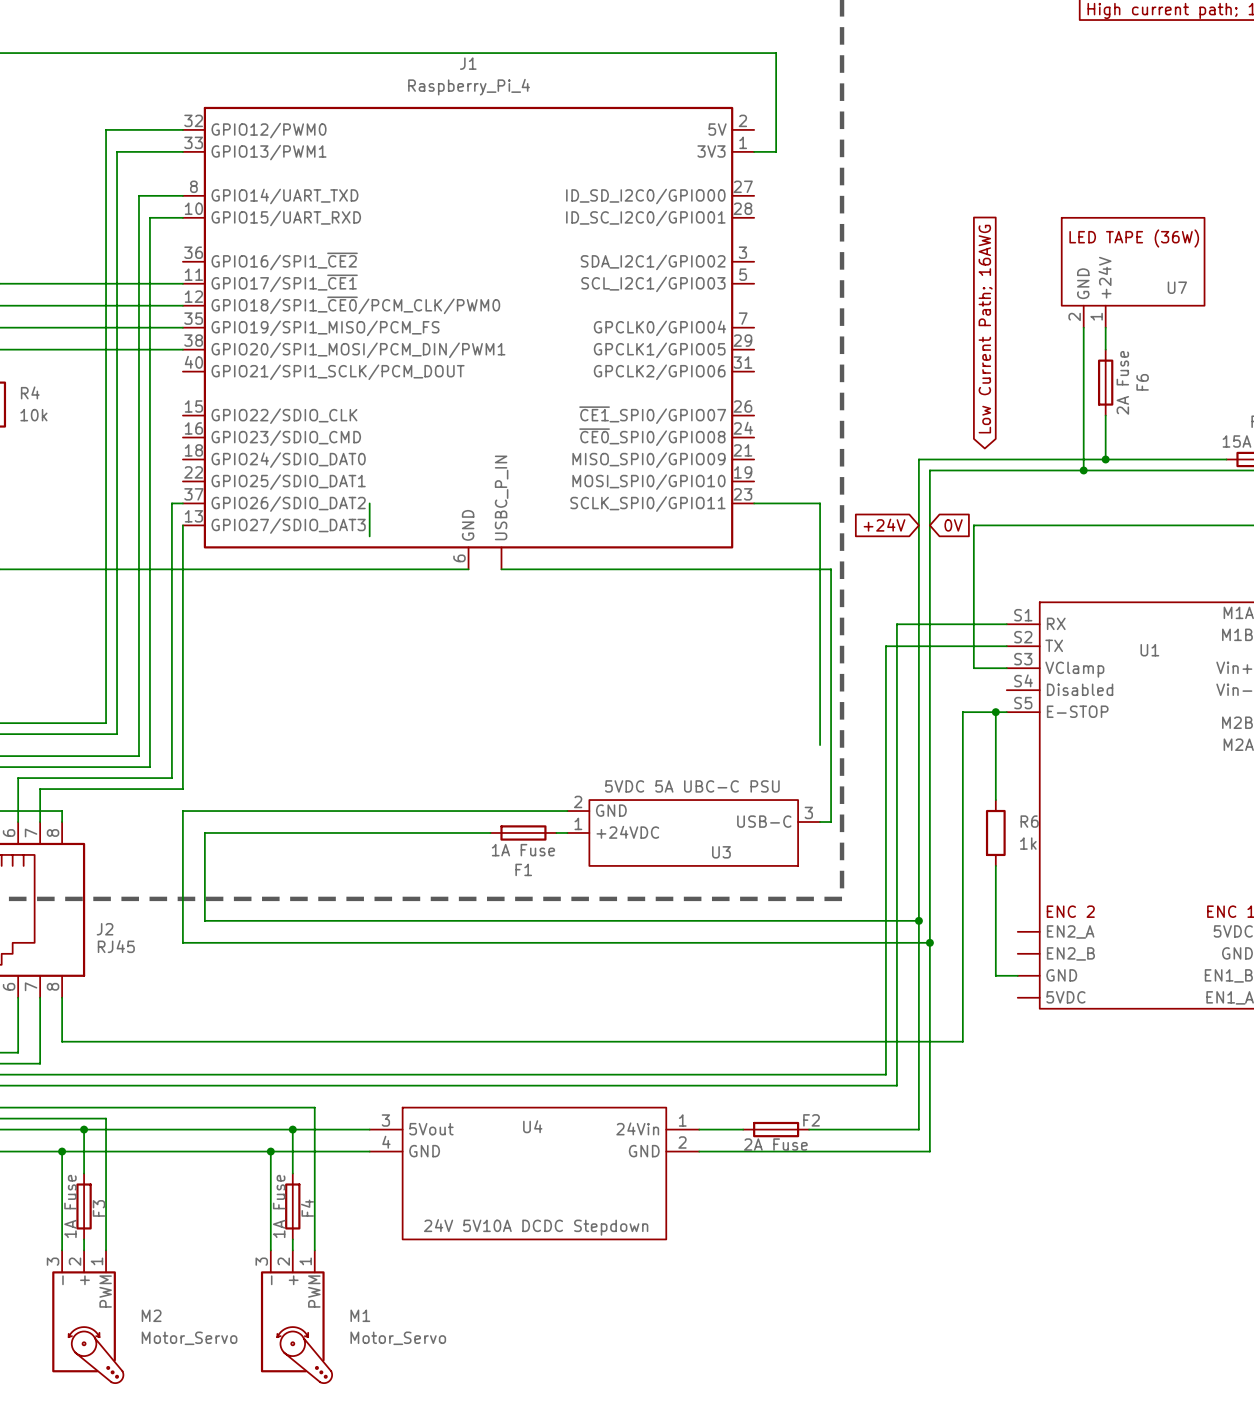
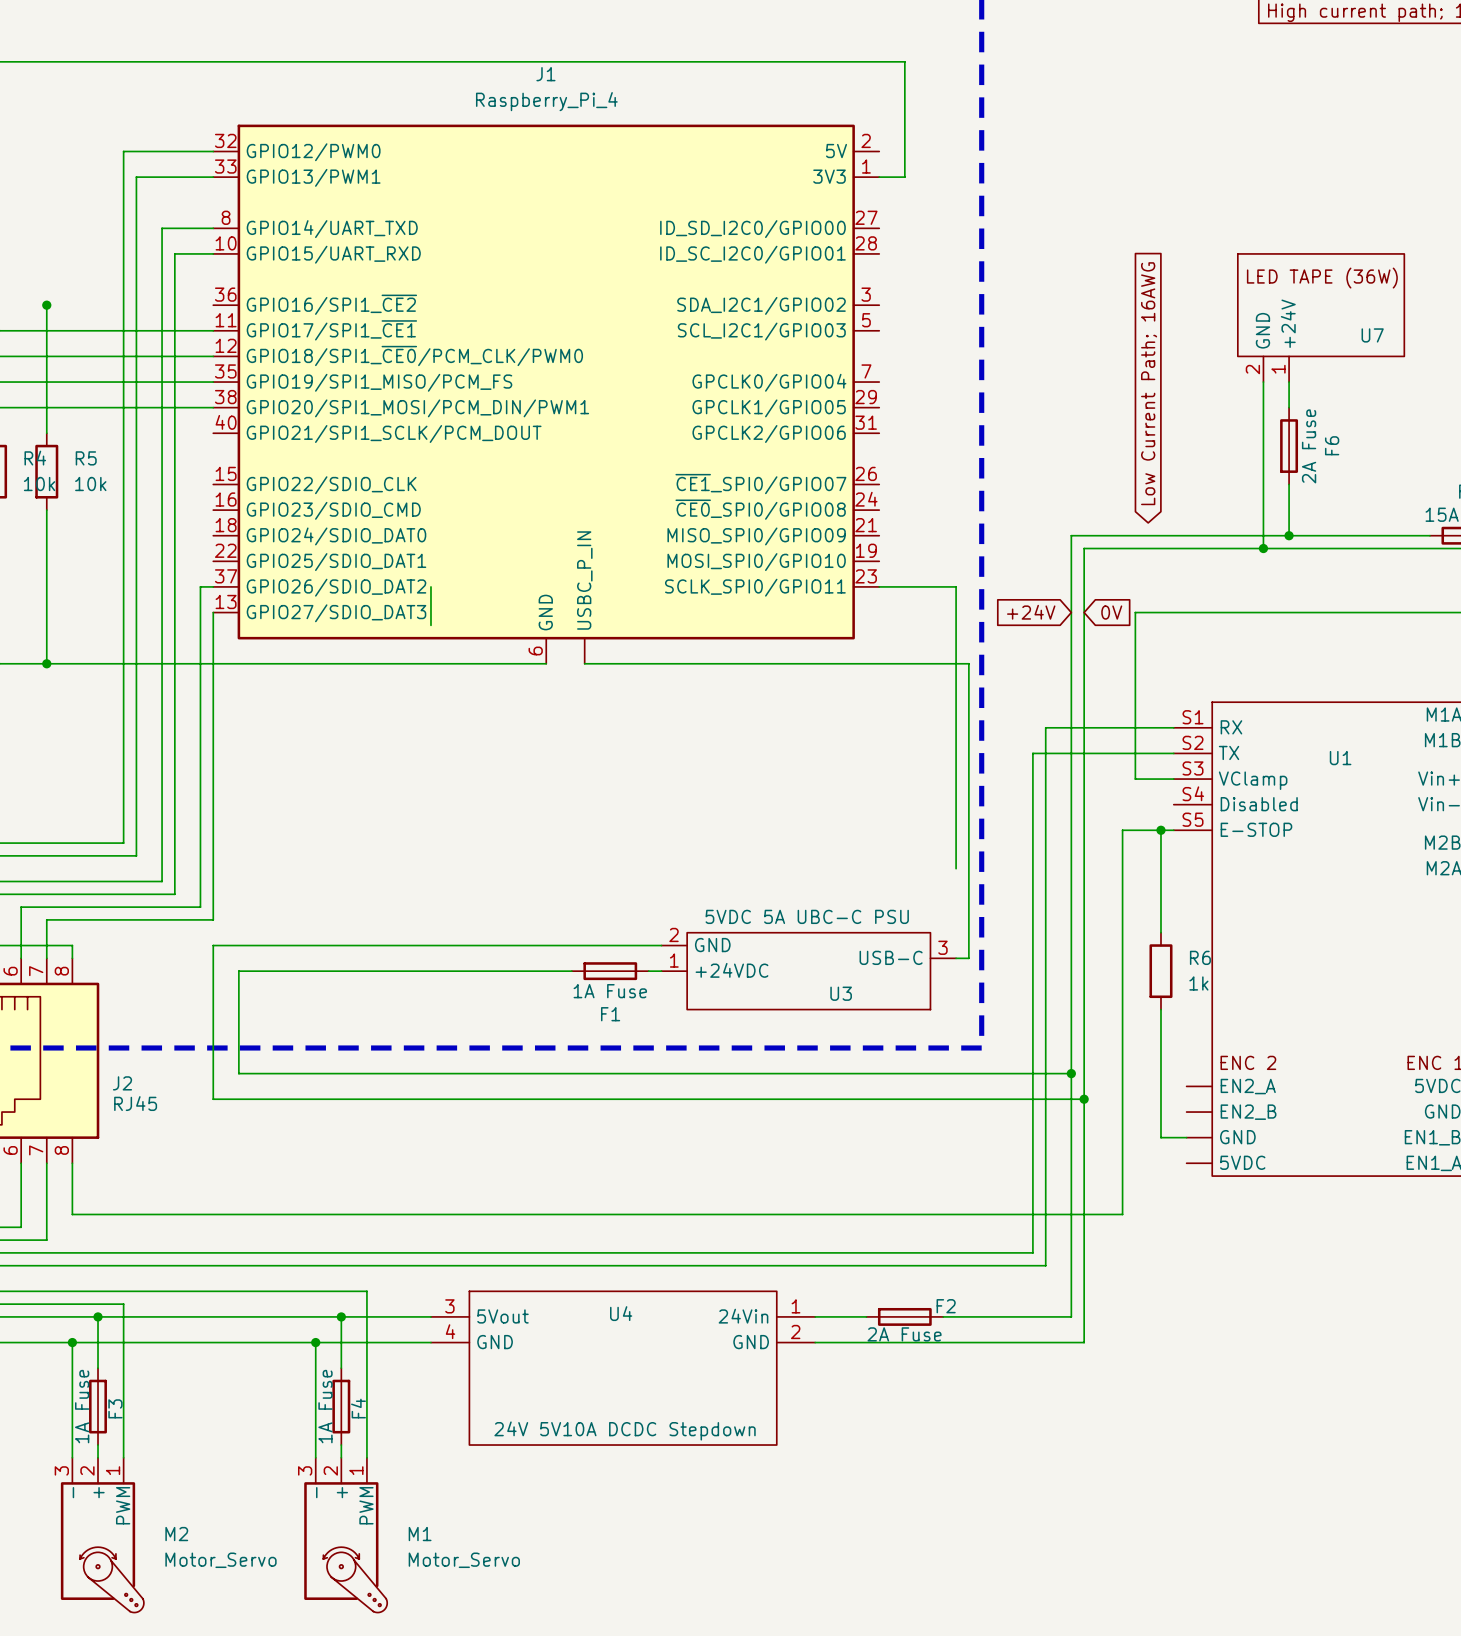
wire: none -> (46, 305) (46, 433)
junction: none -> (46, 305)
R5: none -> 10k (46, 471)
wire: none -> (46, 510) (46, 663)
junction: none -> (46, 663)

